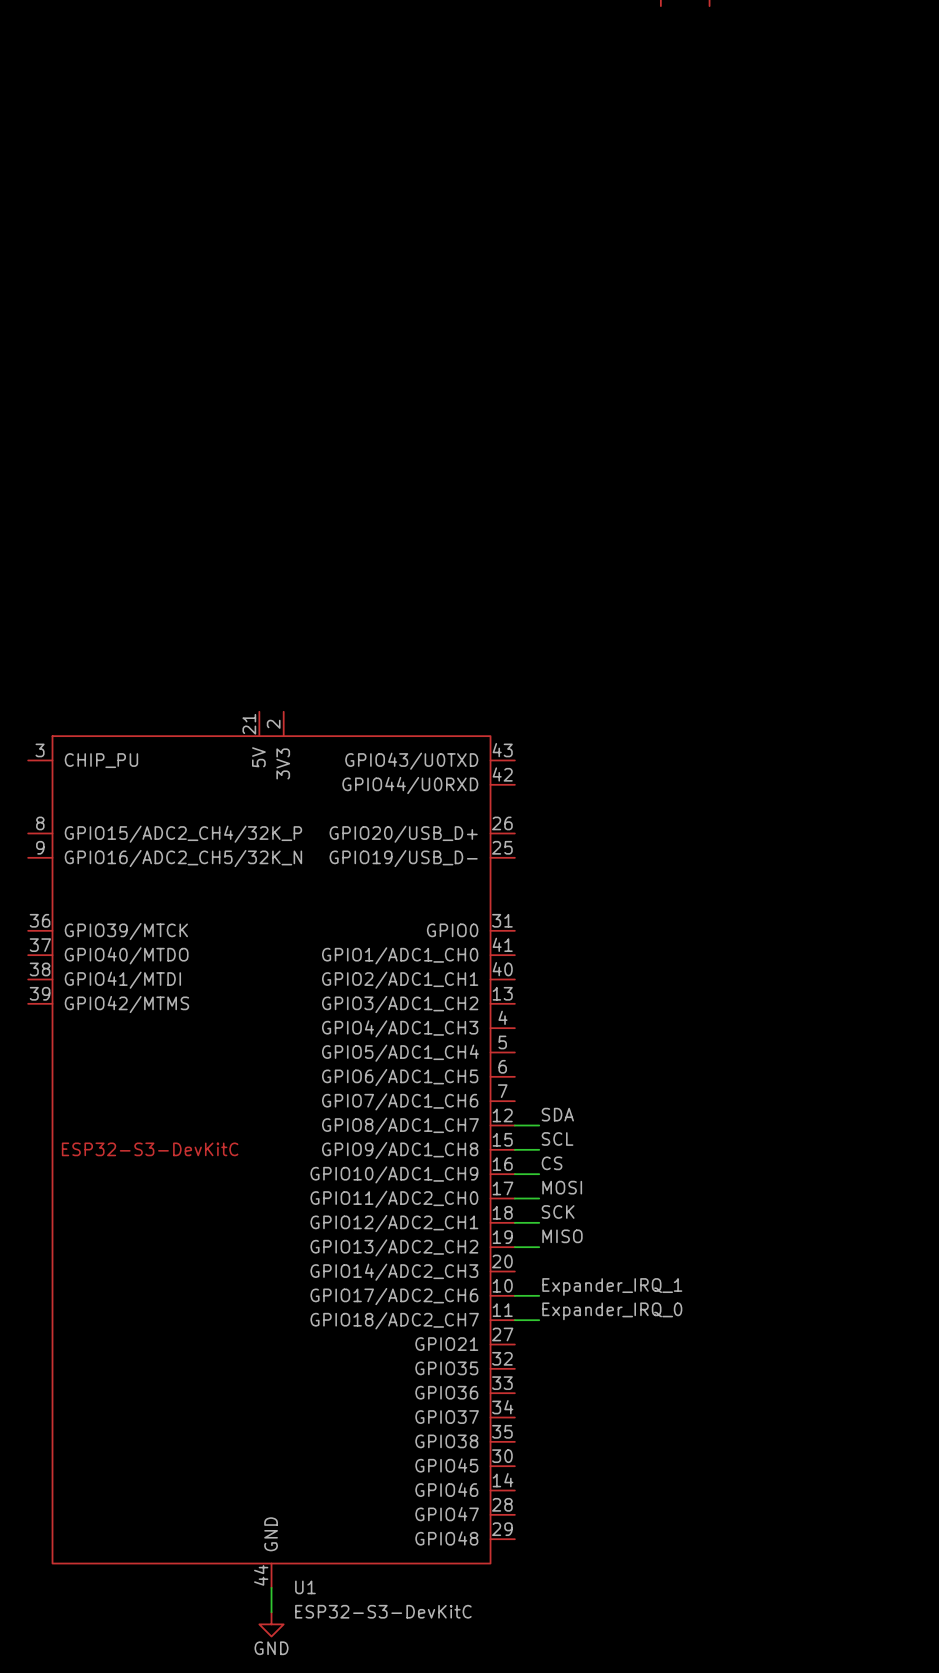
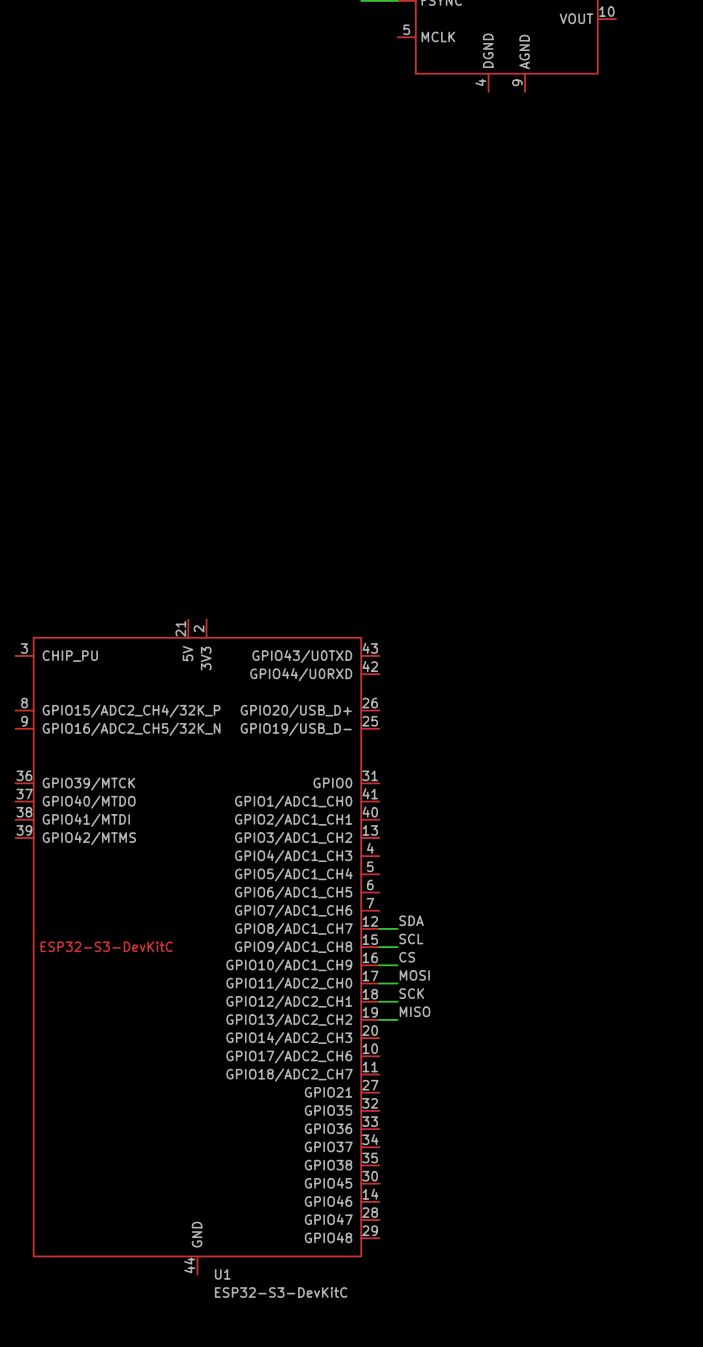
label: Expander_IRQ_1 (612, 1287) -> none
wire: (514, 1295) (539, 1295) -> none
label: Expander_IRQ_0 (612, 1311) -> none
wire: (514, 1320) (539, 1320) -> none
wire: (271, 1587) (271, 1612) -> none
power symbol: GND (271, 1624) -> none

